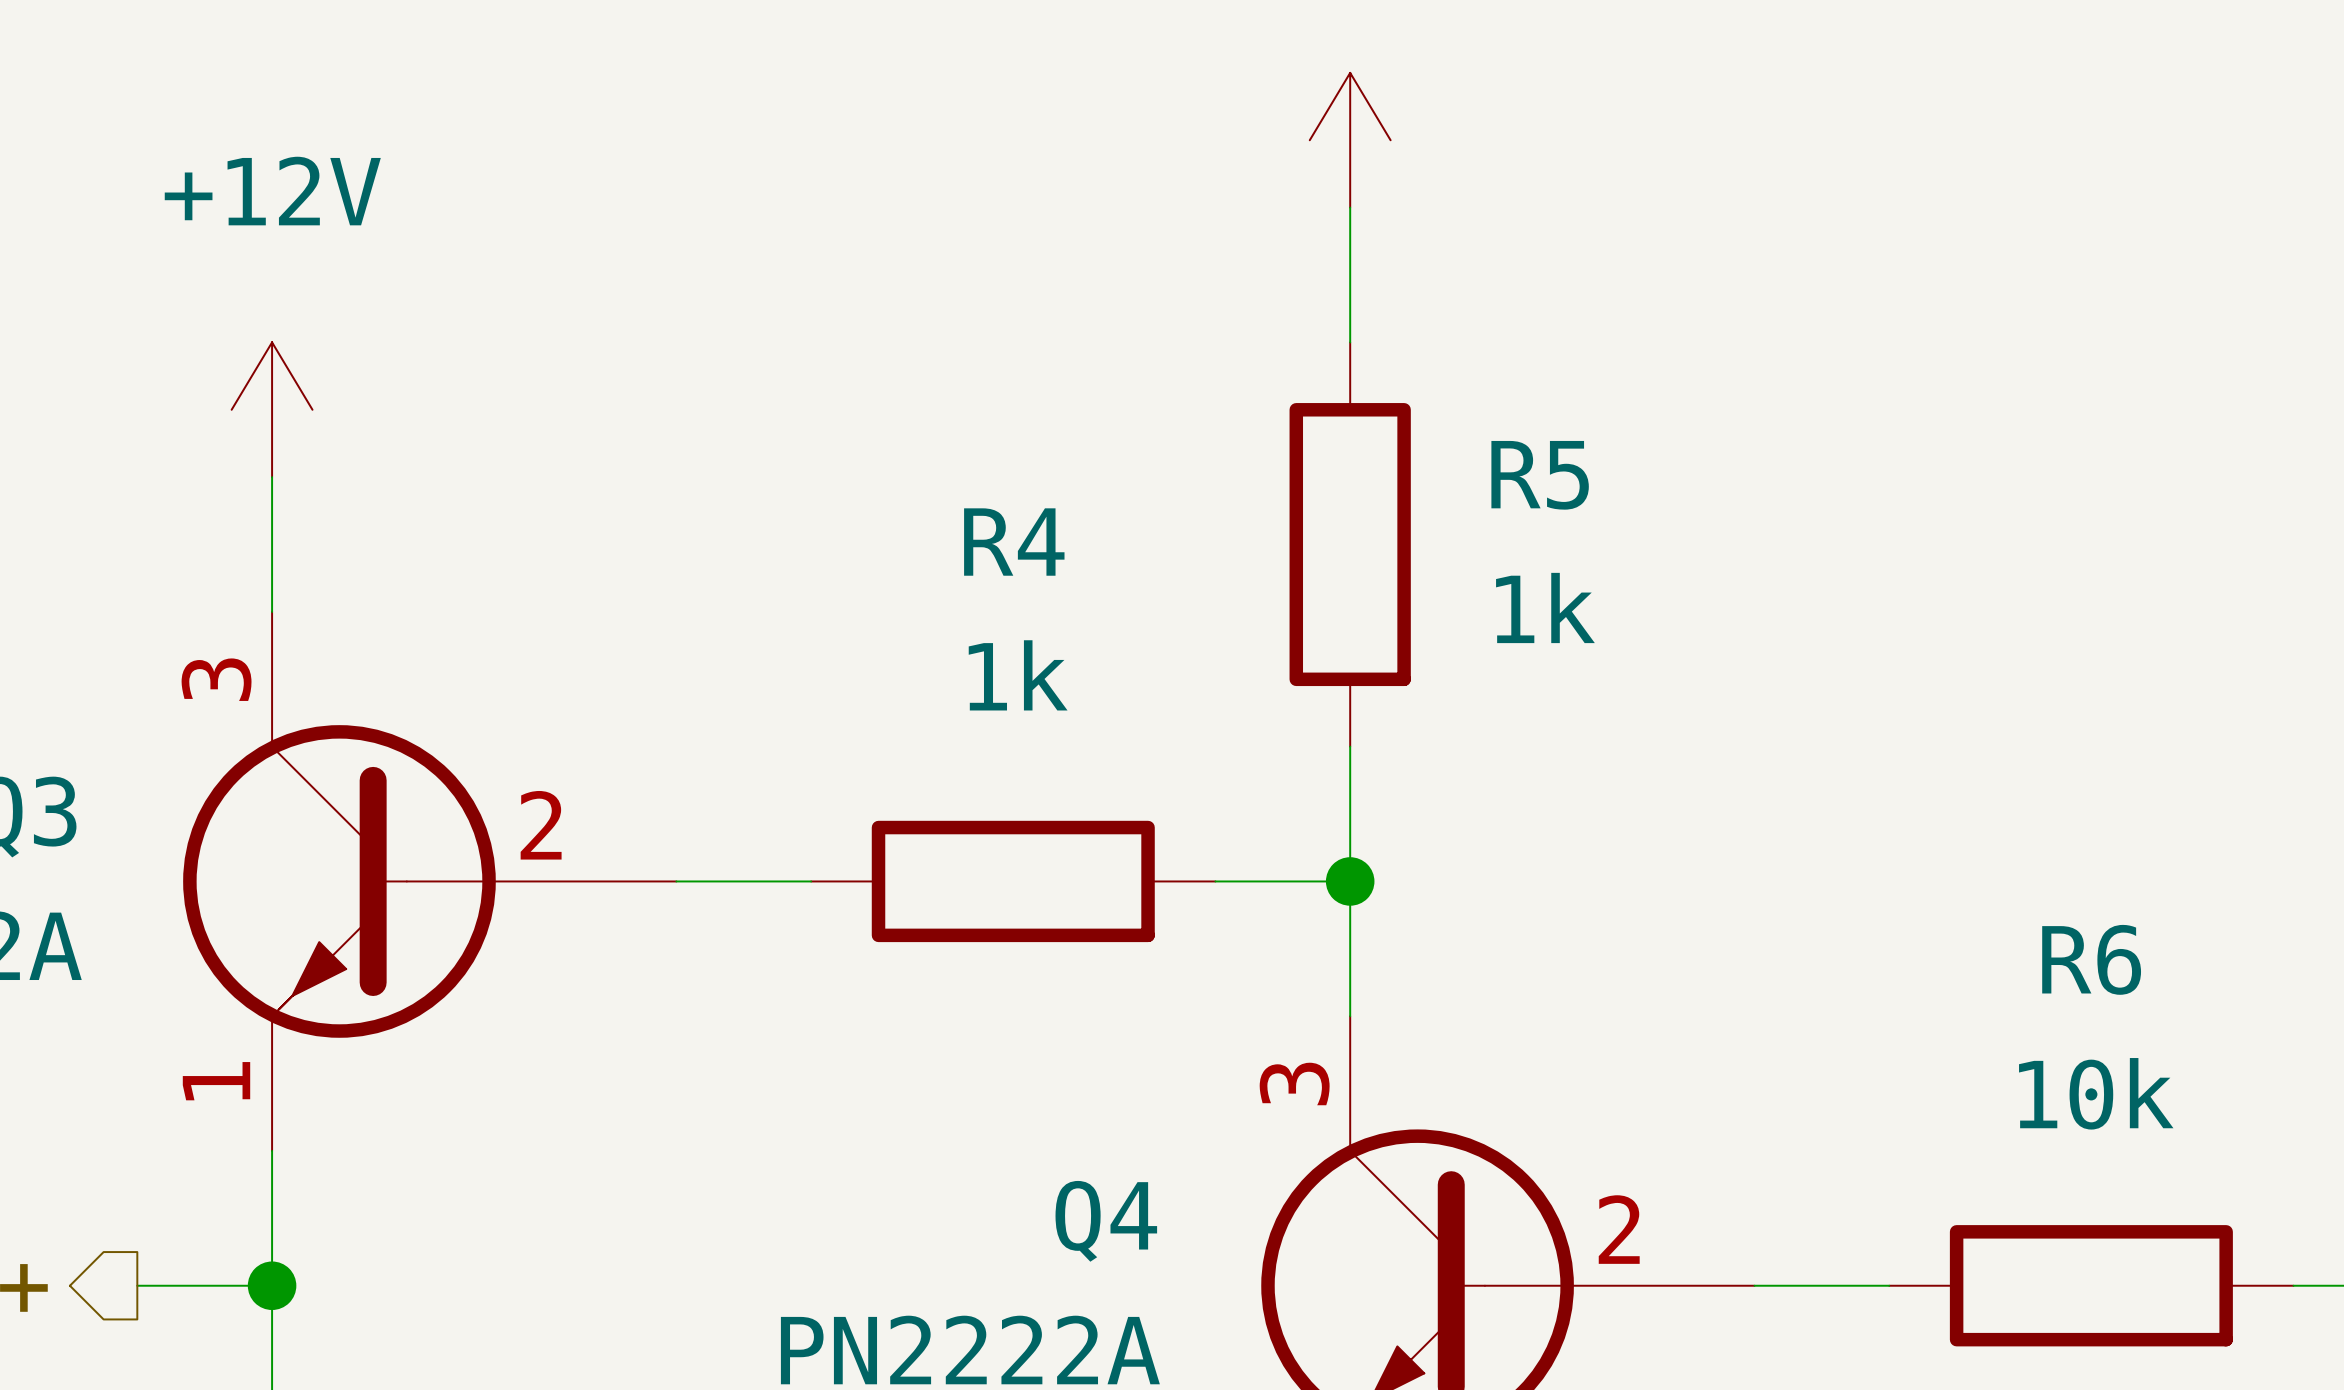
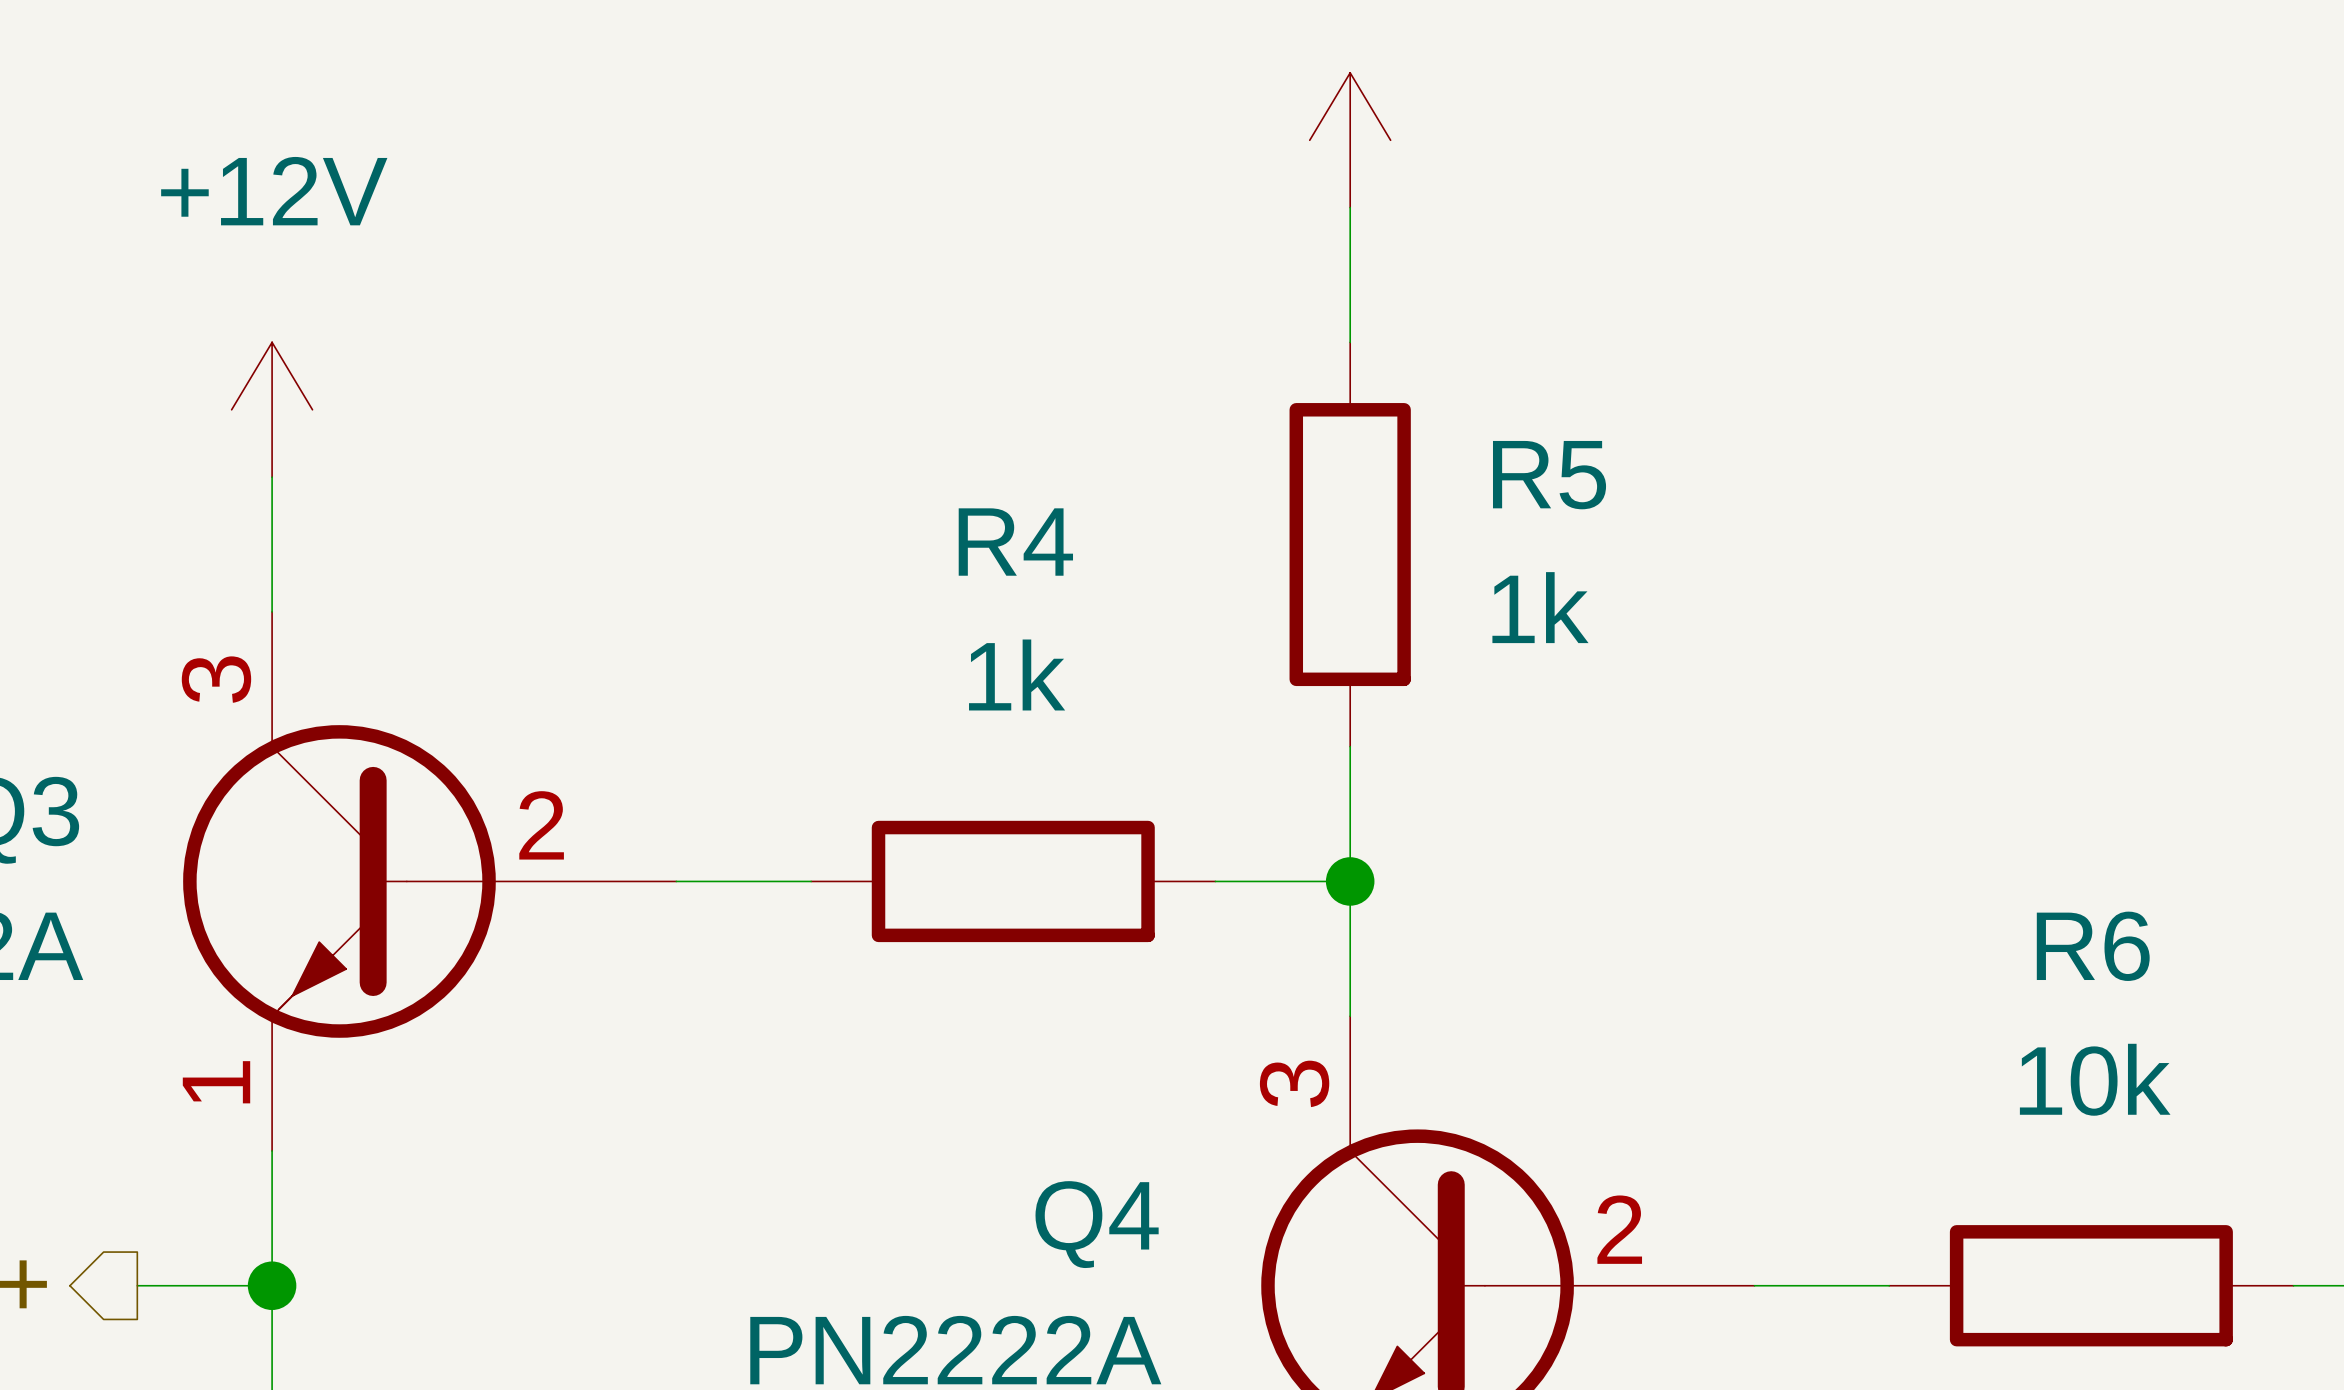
R6 name position: R6 (2091, 959) -> R6 (2093, 946)
R6 value position: 10k (2096, 1093) -> 10k (2095, 1079)

